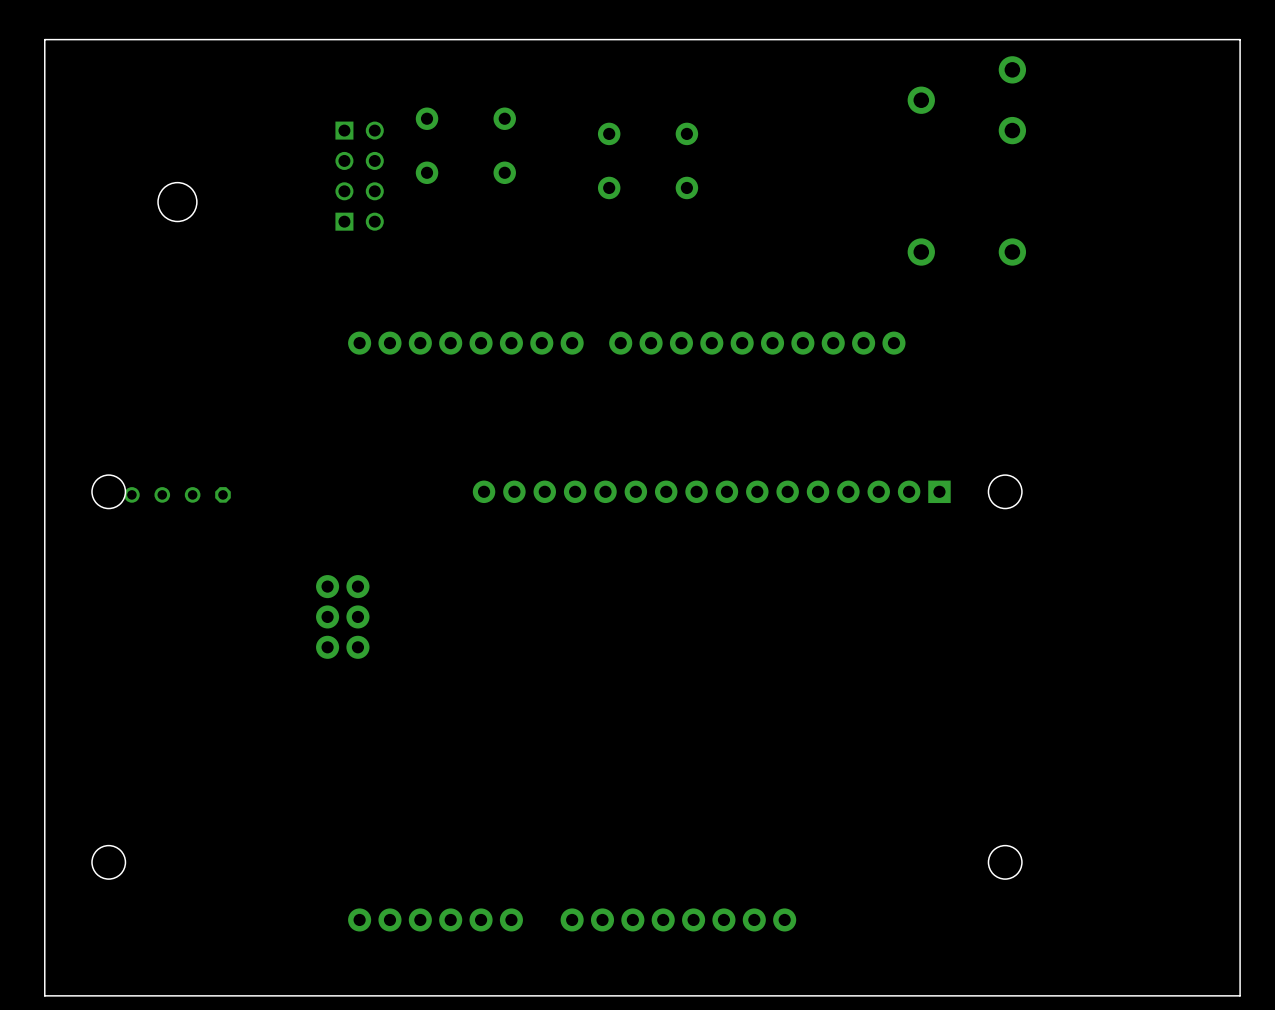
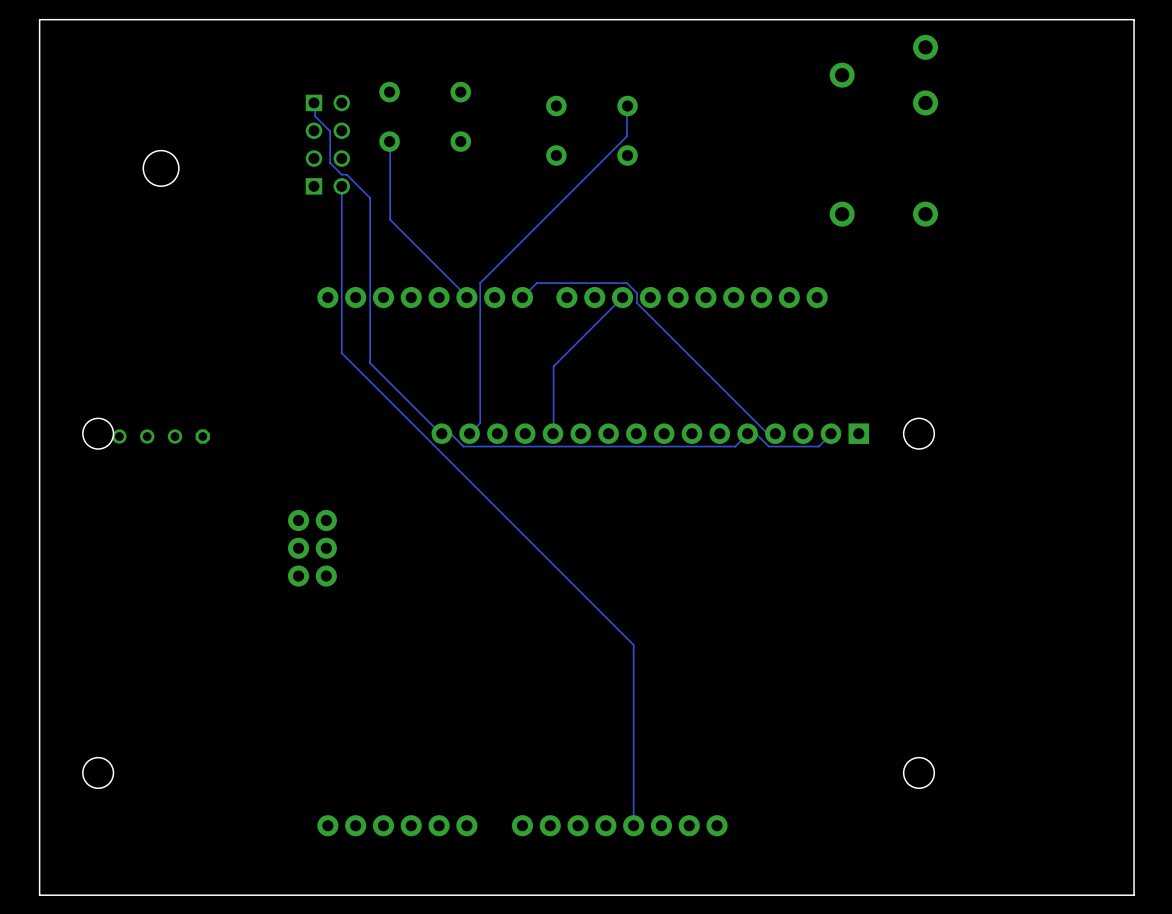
track: none -> (313, 102) (315, 116) (330, 131) (330, 162) (341, 174) (346, 174) (370, 198) (370, 363) (441, 434) (451, 434) (463, 446) (735, 446) (747, 433) (757, 434) (768, 446) (818, 446) (830, 433)
track: none -> (627, 106) (626, 136) (480, 283) (480, 423) (469, 433)
track: none -> (389, 141) (390, 219) (466, 297)
track: none -> (341, 186) (341, 353) (633, 645) (633, 825)
track: none -> (522, 297) (536, 283) (626, 283) (636, 293) (636, 303) (767, 433) (775, 433)
track: none -> (622, 297) (553, 366) (553, 433)

